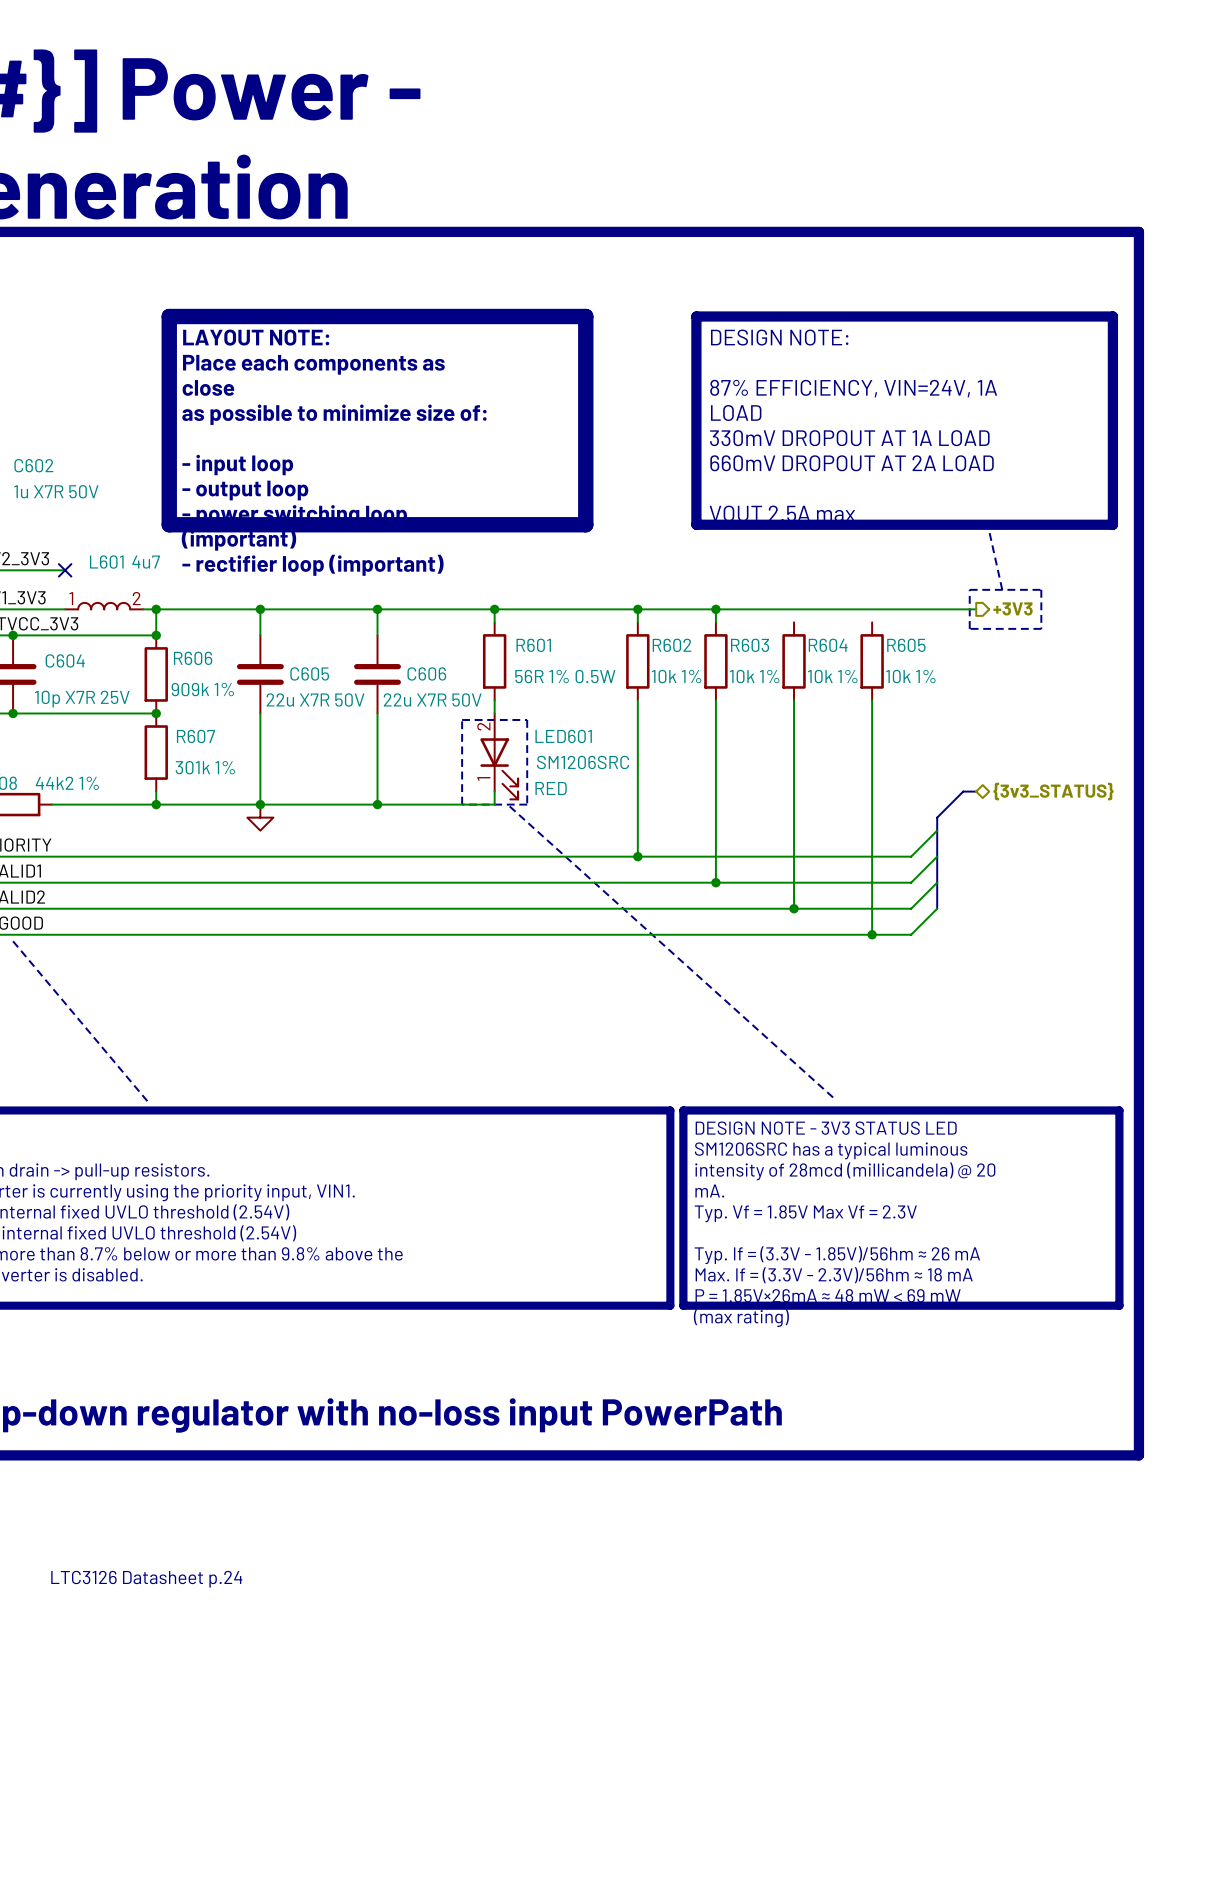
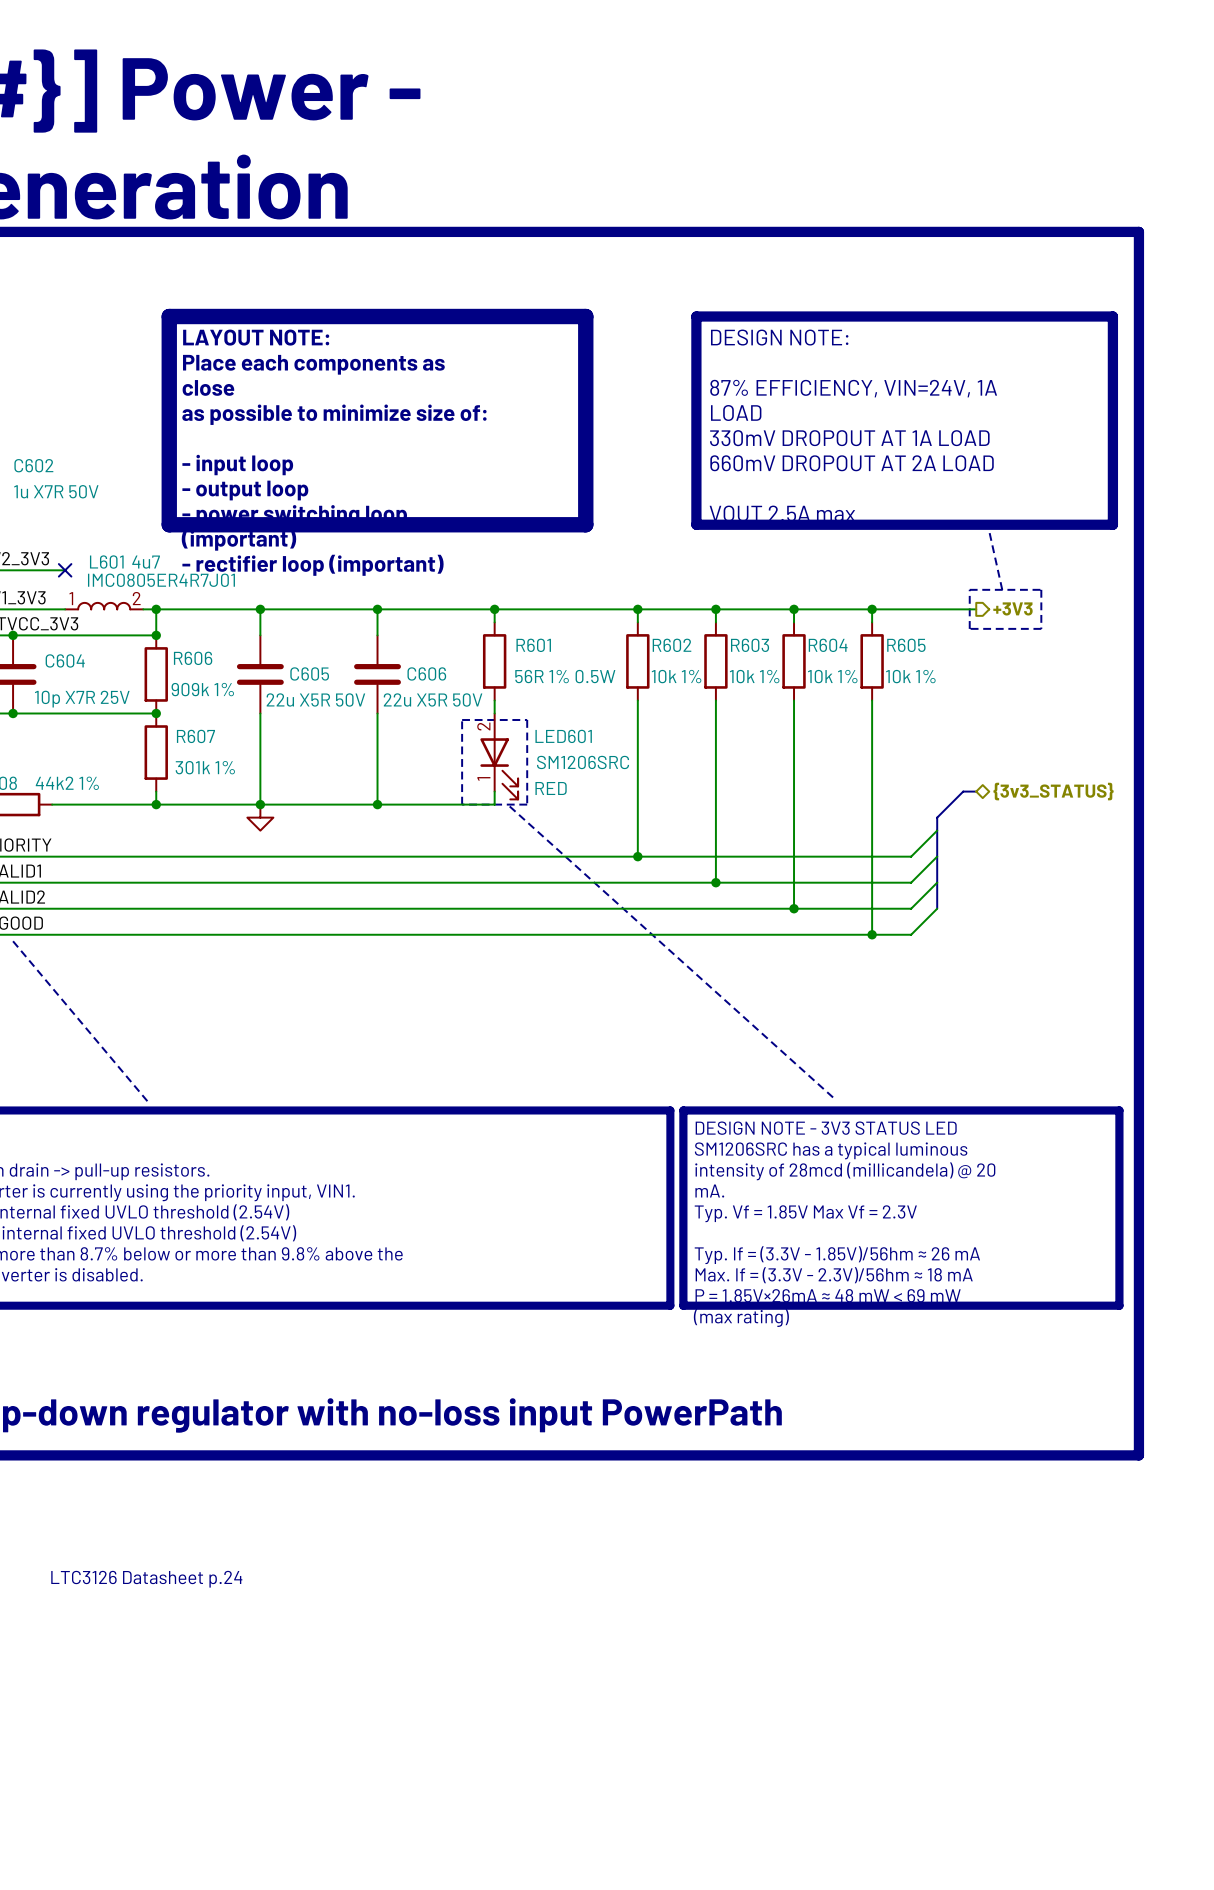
L601 text: none -> IMC0805ER4R7J01 (161, 580)
wire: none -> (794, 609) (794, 622)
junction: none -> (794, 609)
wire: none -> (872, 609) (872, 622)
junction: none -> (872, 609)
C605 value: 22u X7R 50V (315, 699) -> 22u X5R 50V (315, 699)
C606 value: 22u X7R 50V (432, 699) -> 22u X5R 50V (433, 699)

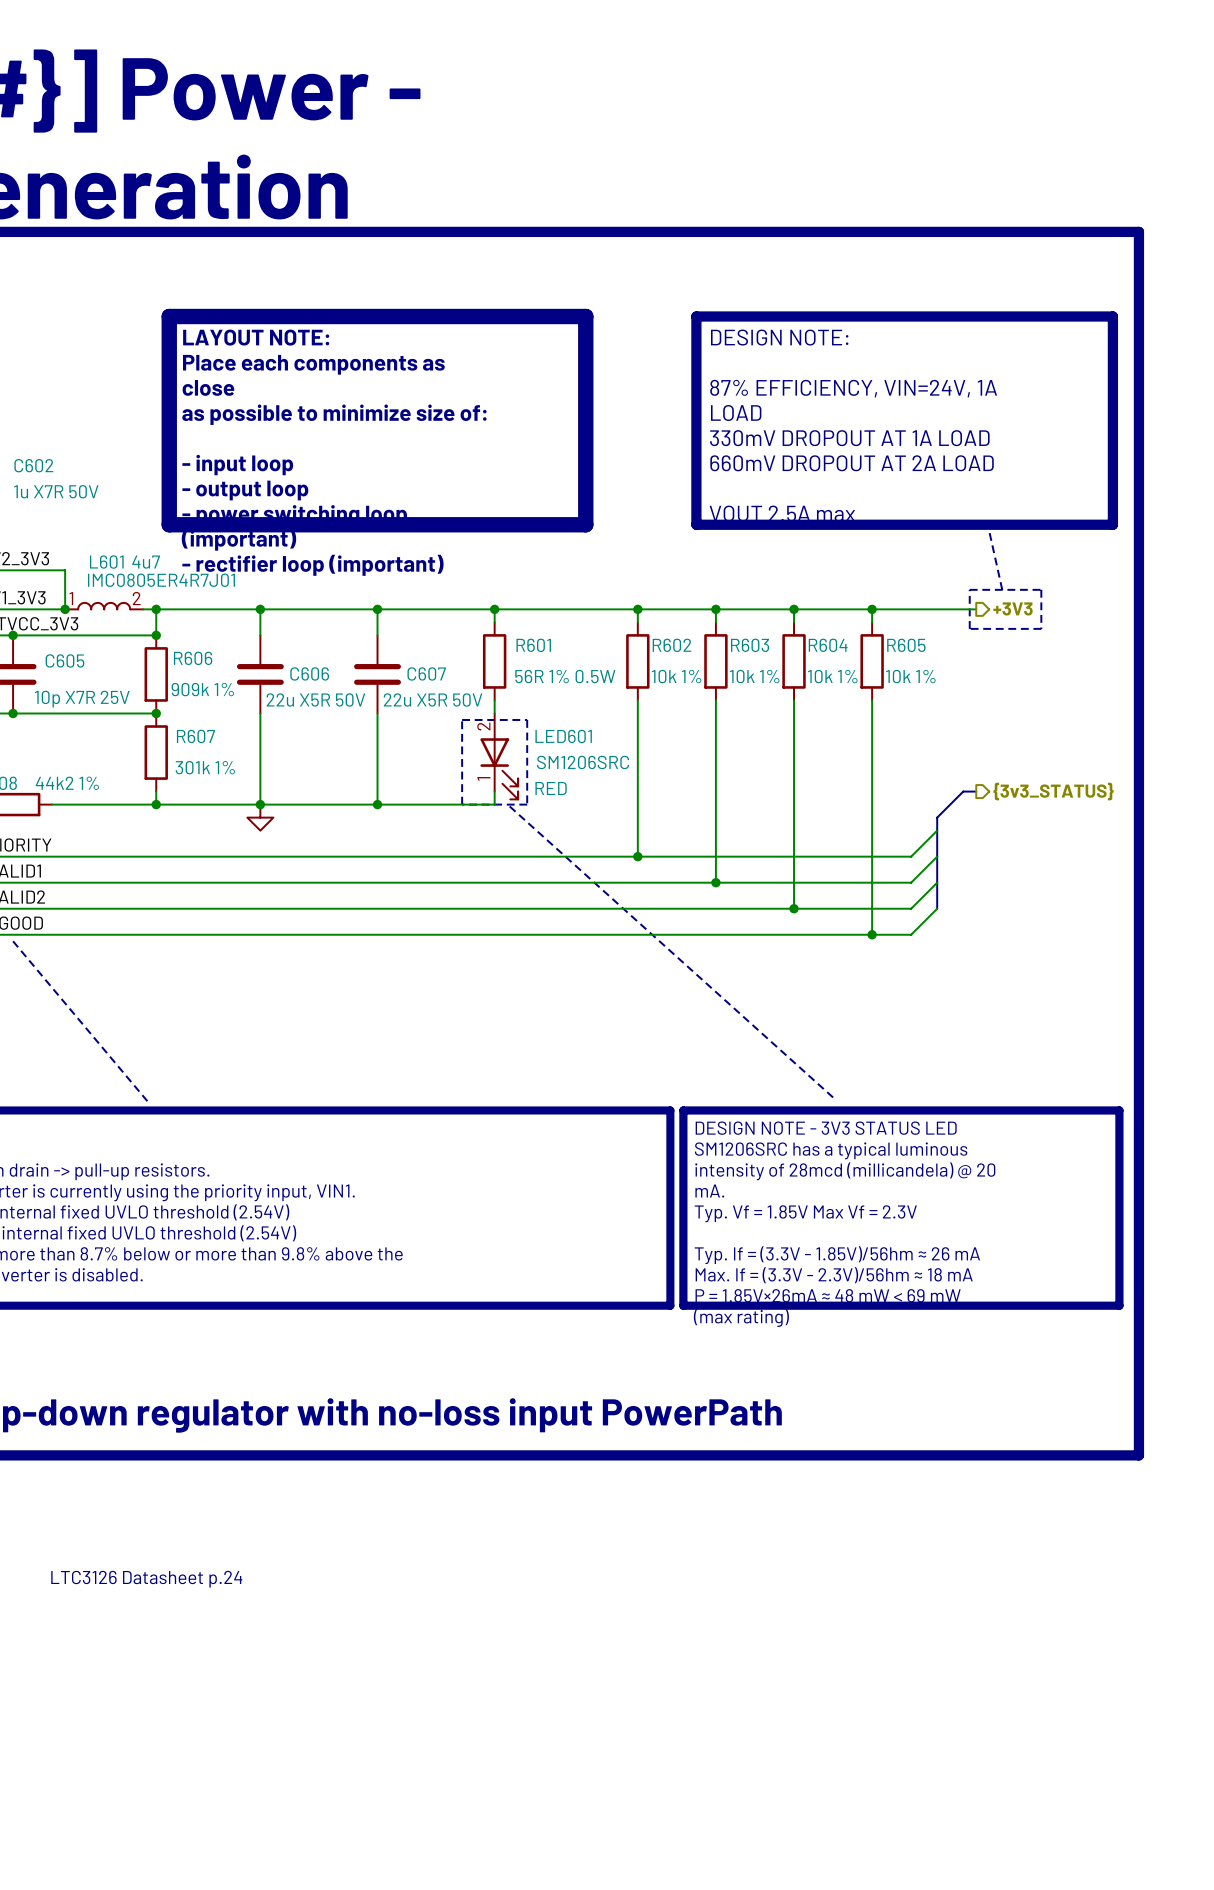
wire: none -> (65, 570) (65, 609)
no-connect mark: (65, 570) -> none
junction: none -> (65, 609)
C604 name: C604 (65, 660) -> C605 (64, 660)
C605 name: C605 (309, 673) -> C606 (309, 673)
C606 name: C606 (426, 673) -> C607 (426, 673)
hierarchical label shape: bidirectional (1053, 791) -> output (1053, 791)

